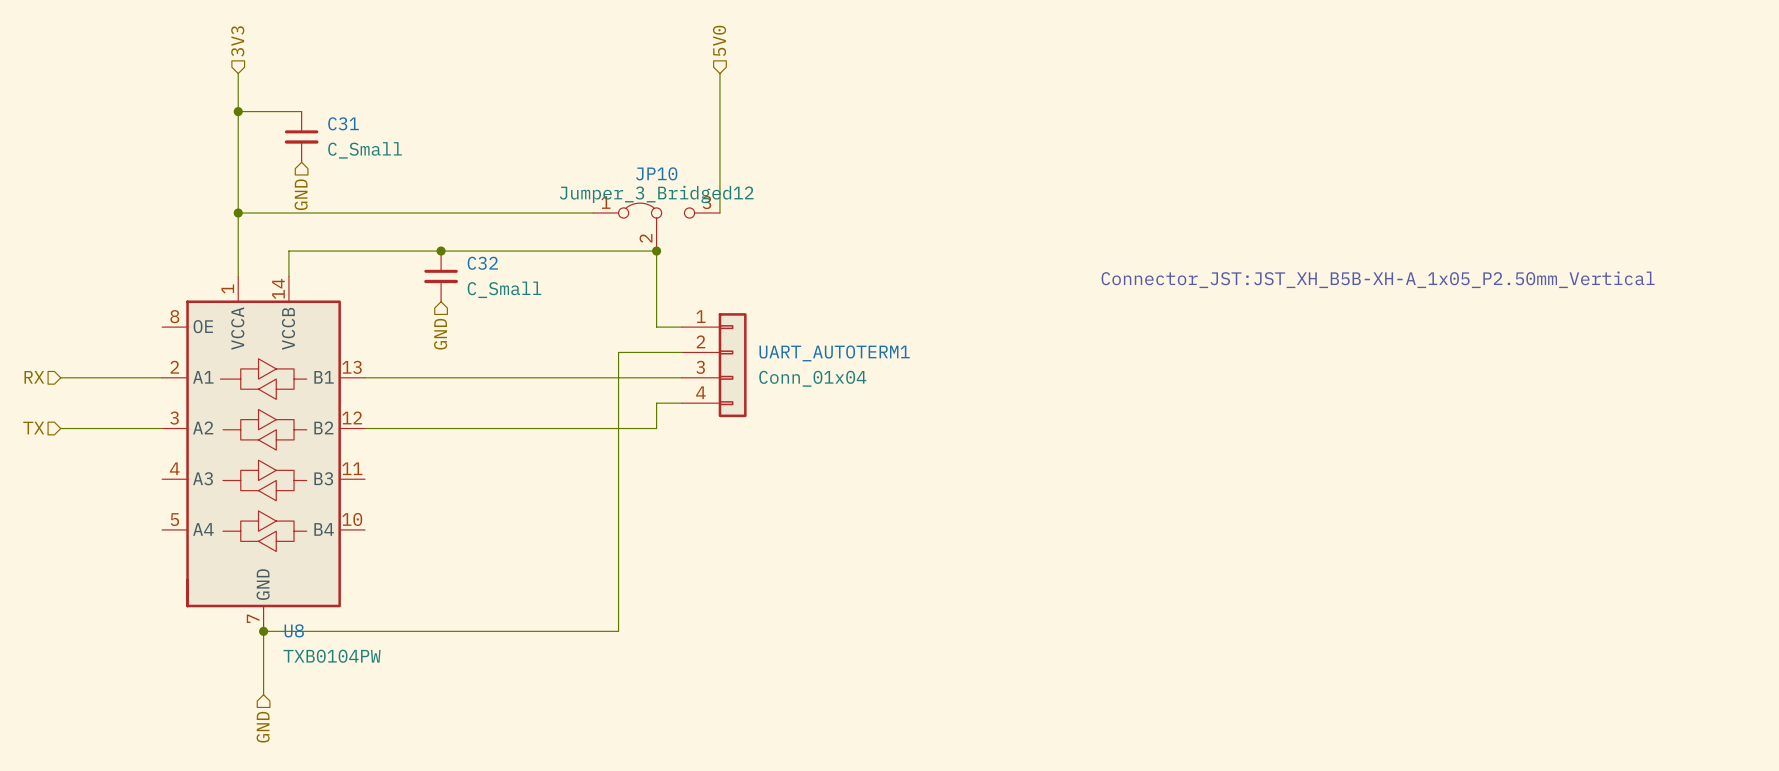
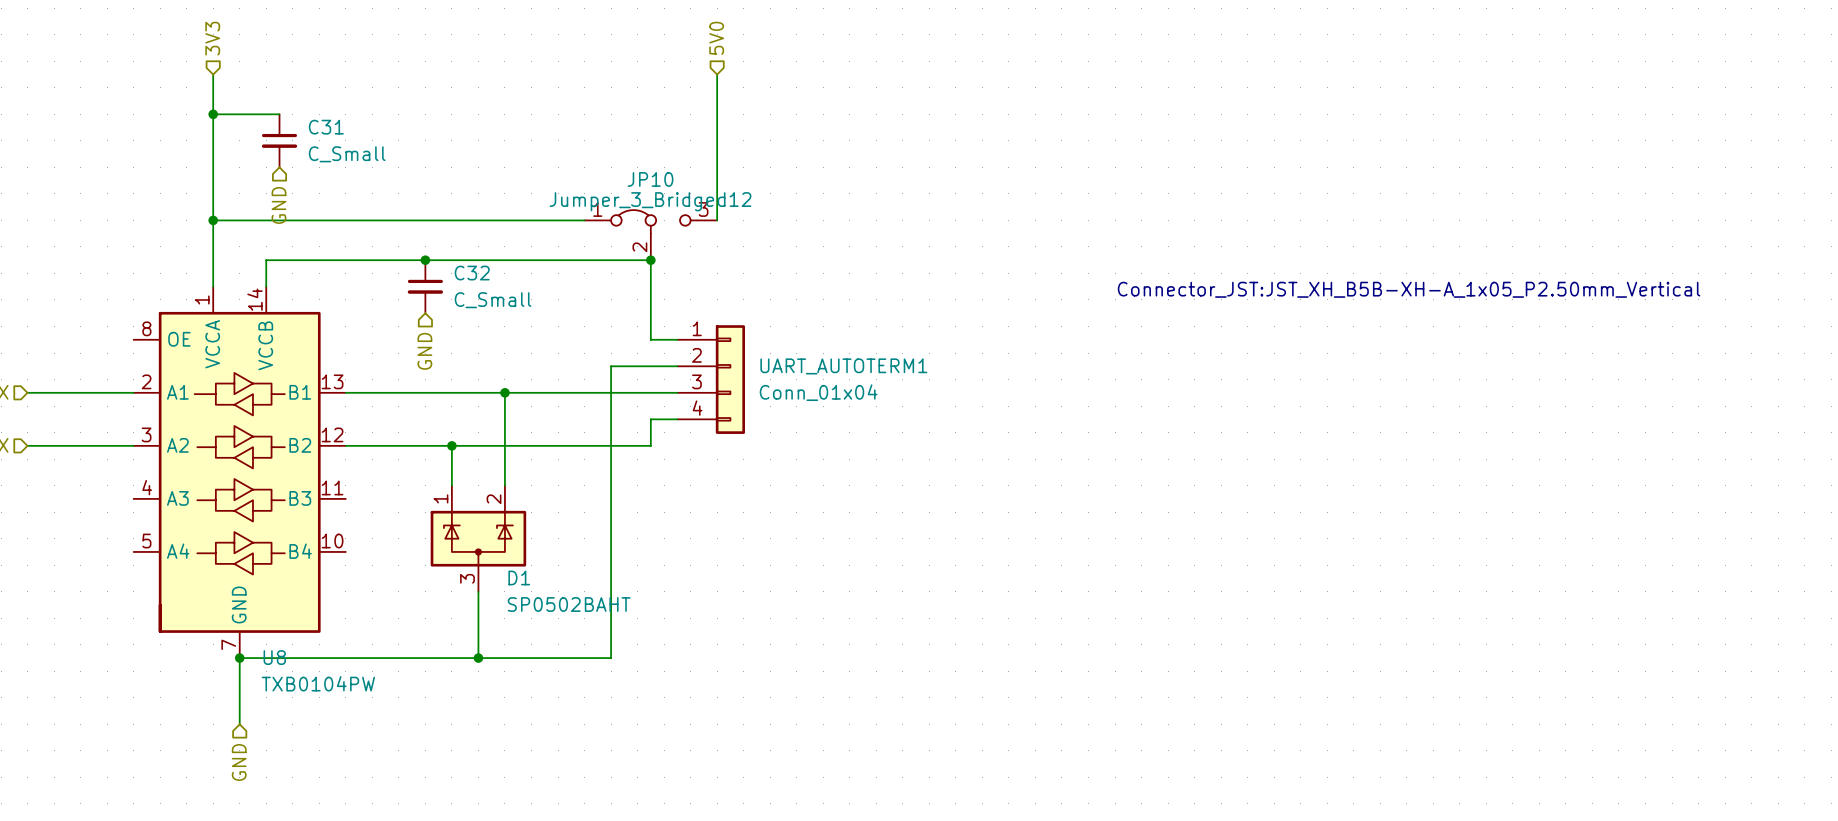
wire: none -> (504, 392) (504, 485)
junction: none -> (504, 392)
wire: none -> (451, 445) (451, 485)
junction: none -> (451, 445)
D1: none -> SP0502BAHT (478, 538)
wire: none -> (478, 591) (478, 658)
junction: none -> (478, 658)

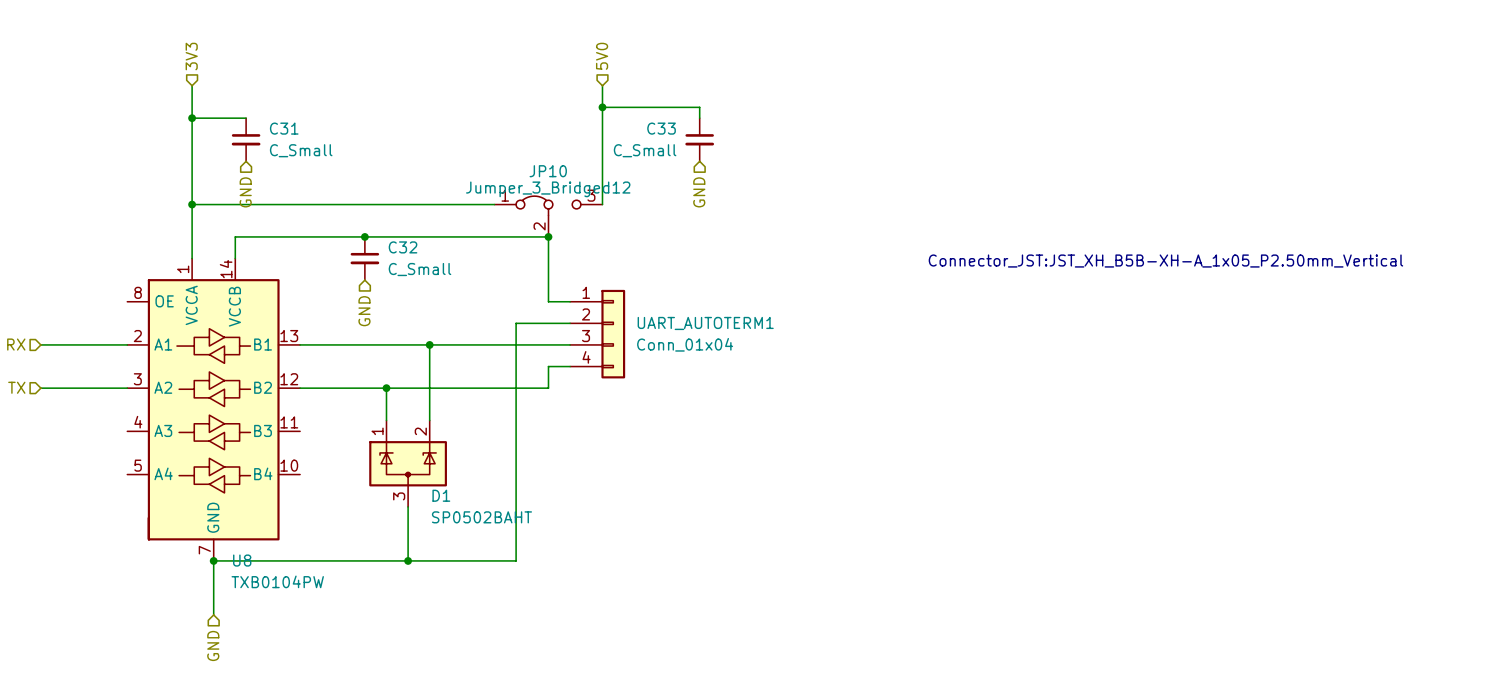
wire: none -> (602, 107) (699, 107) (699, 118)
junction: none -> (602, 107)
C33: none -> C_Small (699, 139)
hierarchical label: none -> GND (699, 192)

